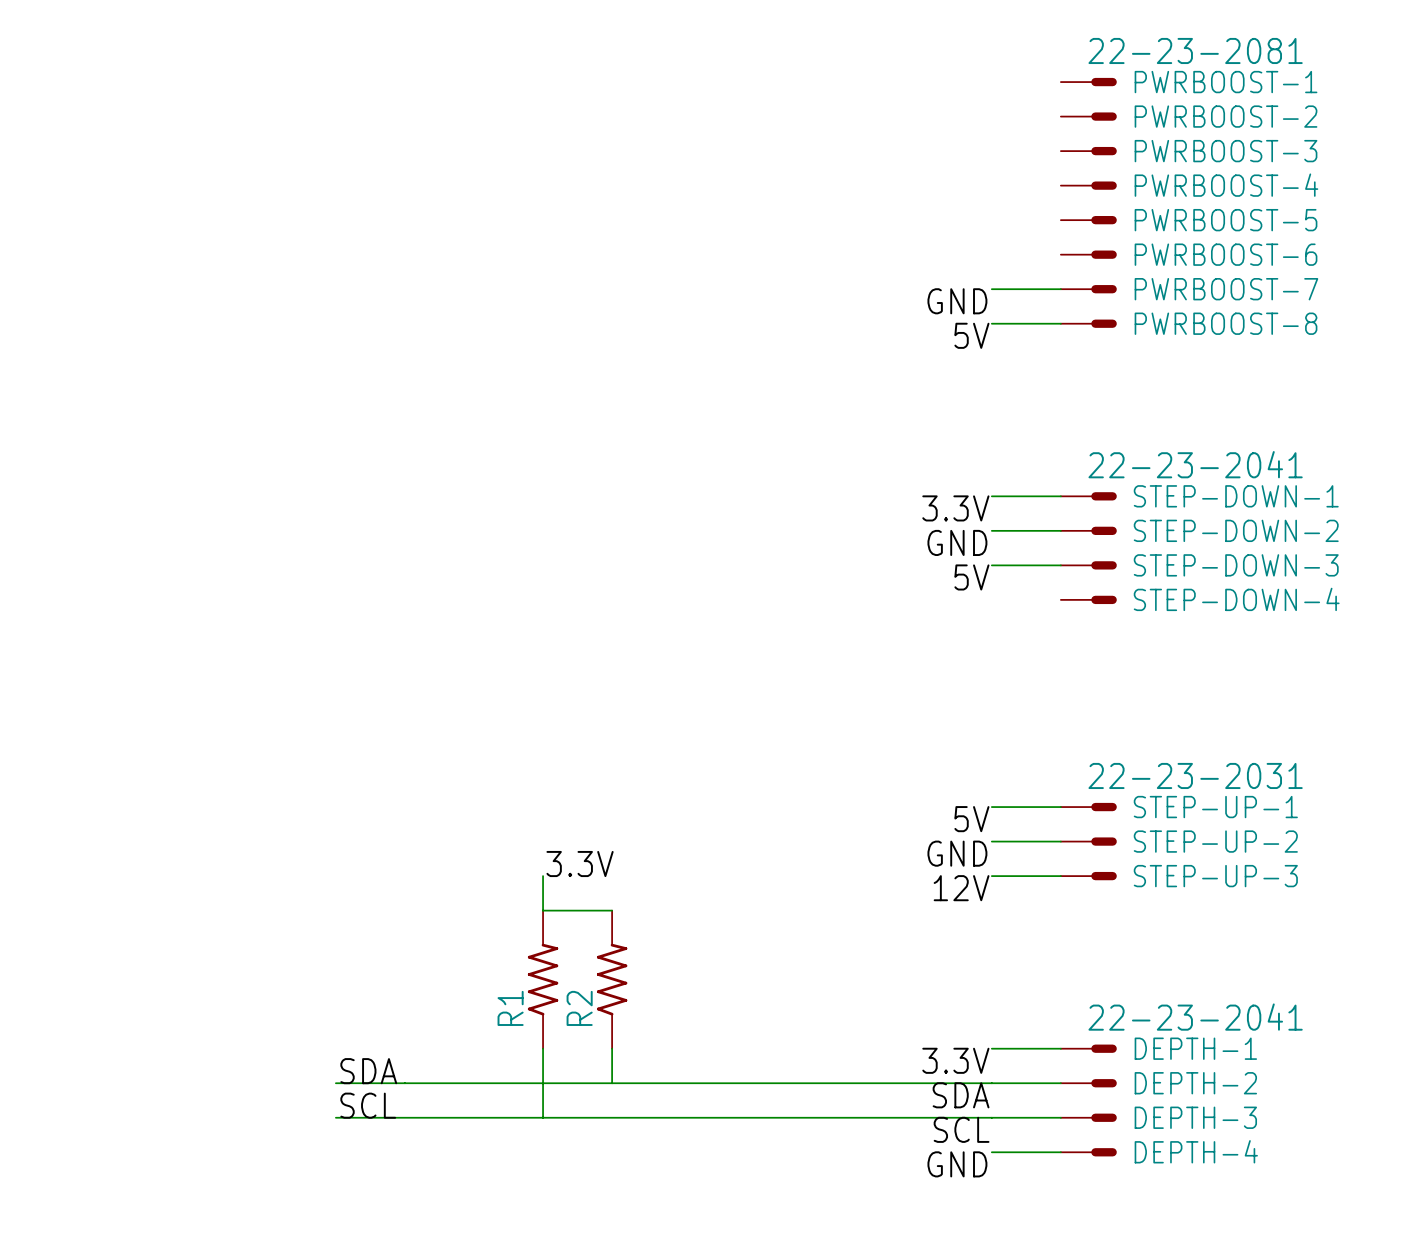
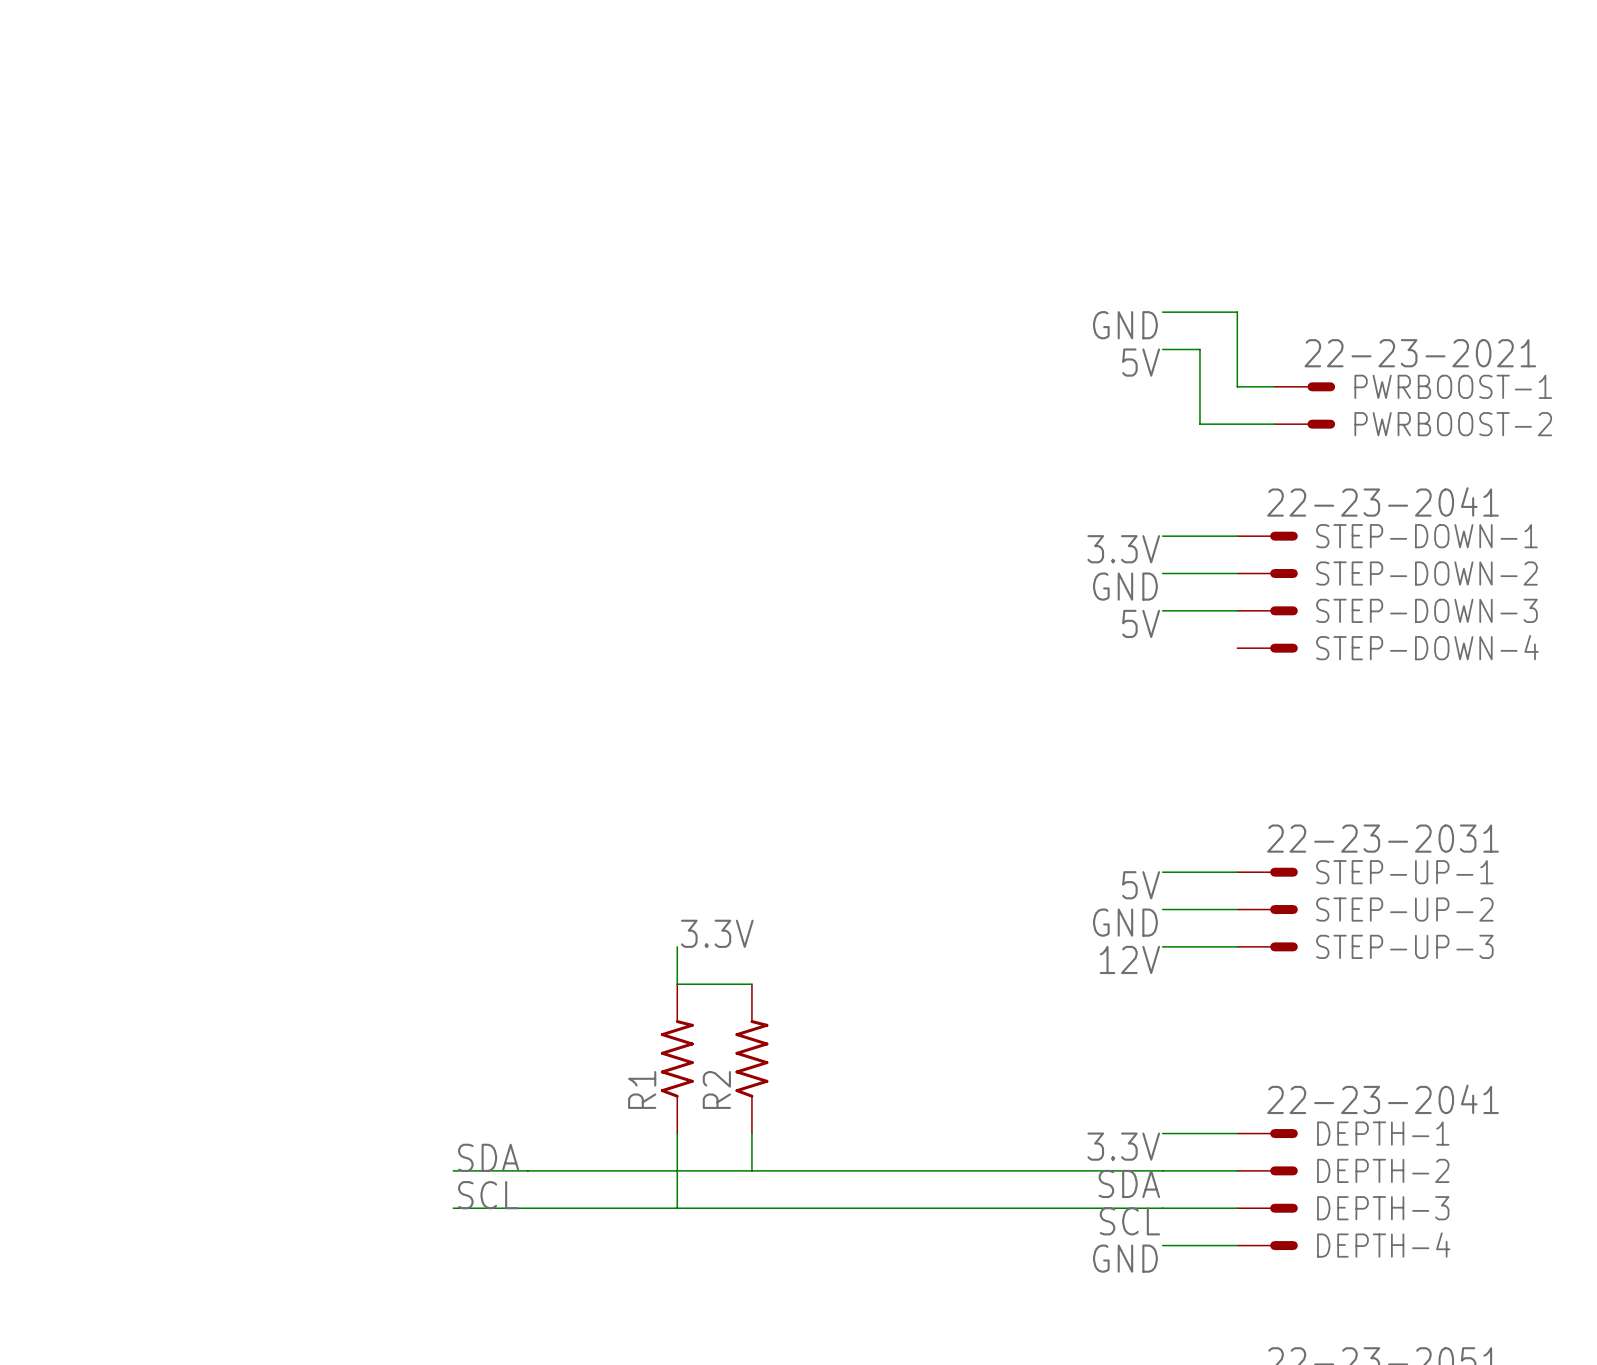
PWRBOOST-1 value: 22-23-2081 (1195, 50) -> 22-23-2021 (1420, 353)
PWRBOOST-1 position: (1088, 82) -> (1304, 386)
PWRBOOST-2 position: (1088, 116) -> (1304, 424)
PWRBOOST-3: (1088, 151) -> none
PWRBOOST-4: (1088, 185) -> none
PWRBOOST-5: (1088, 220) -> none
PWRBOOST-6: (1088, 254) -> none
wire: none -> (1237, 312) (1237, 386) (1274, 386)
PWRBOOST-7: (1088, 289) -> none
wire: (1026, 323) (1060, 323) -> (1199, 349) (1199, 424) (1274, 424)
PWRBOOST-8: (1088, 323) -> none

